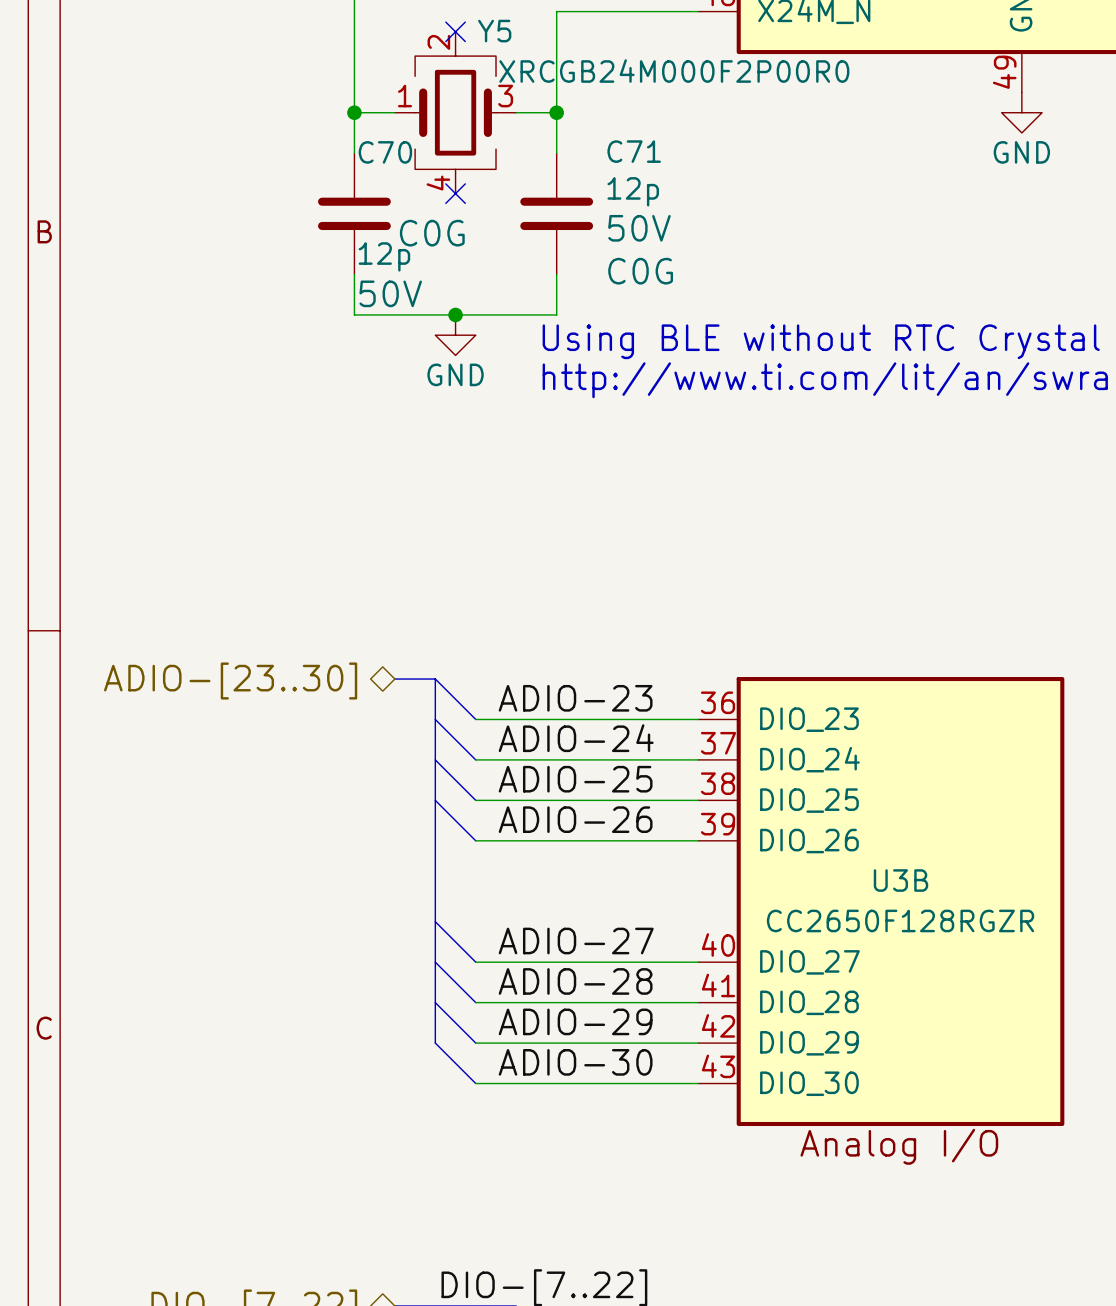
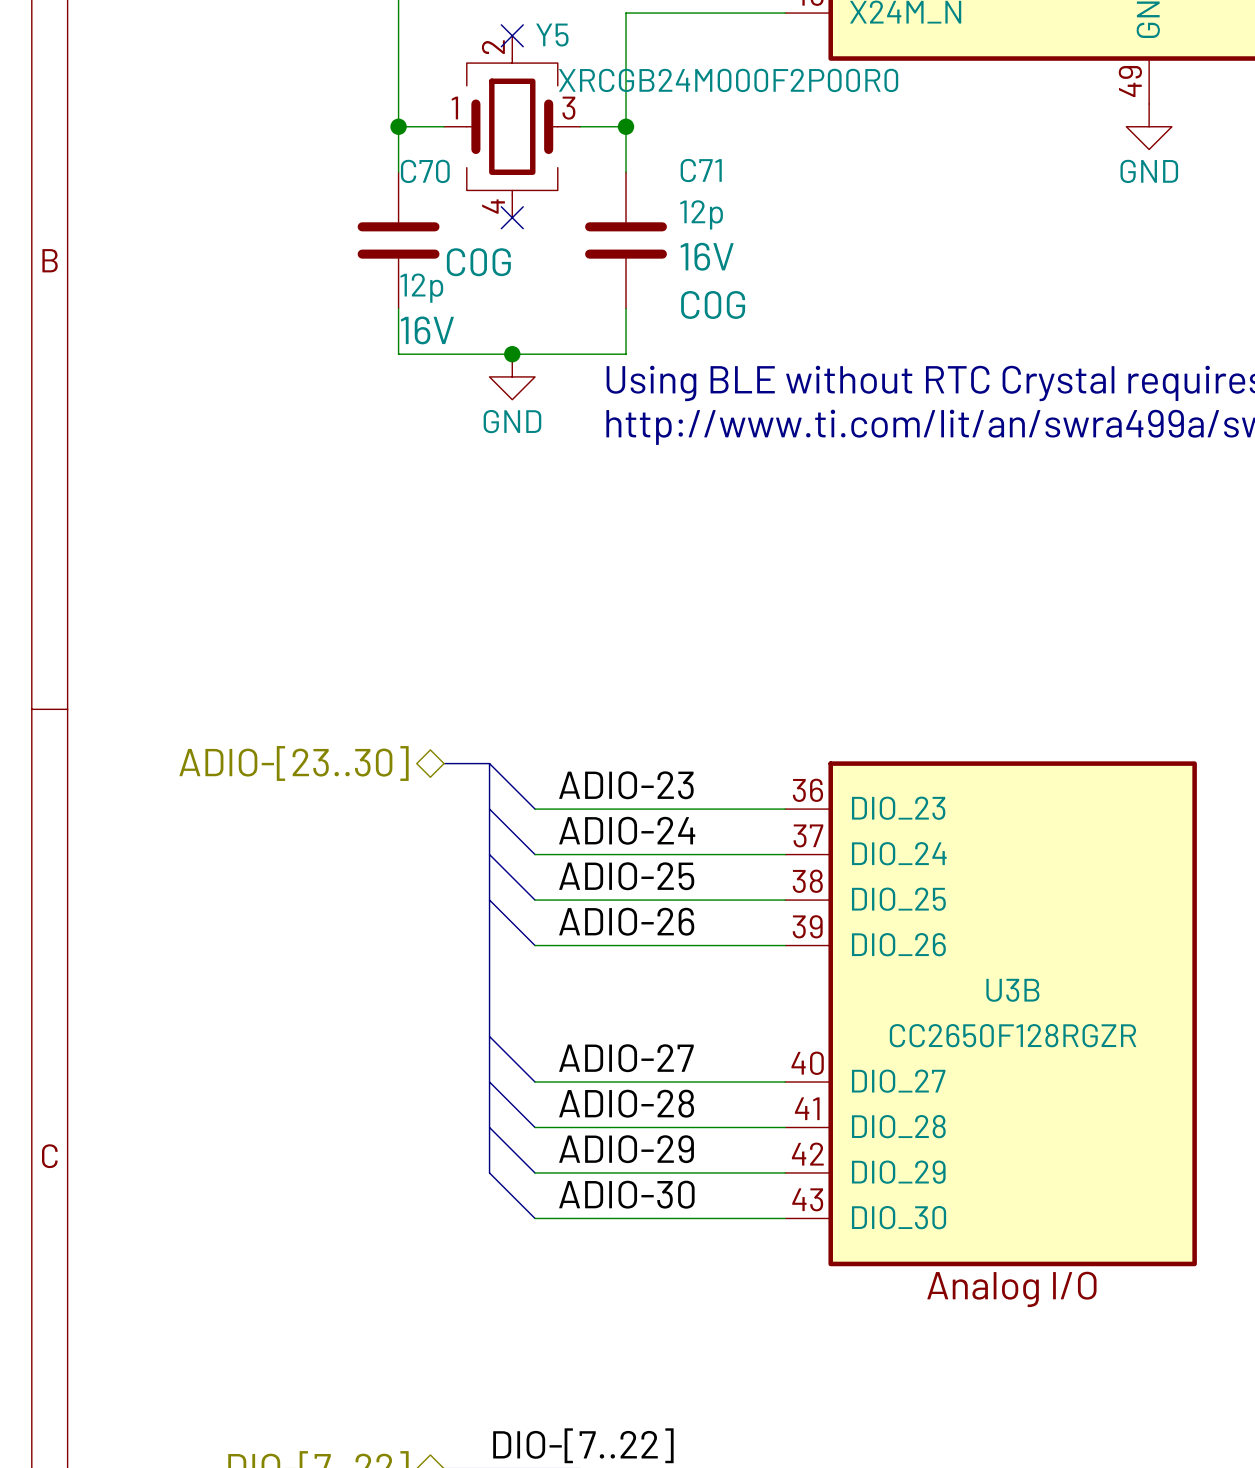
C71 text: 50V (639, 228) -> 16V (707, 256)
C70 text: 50V (390, 293) -> 16V (427, 330)

